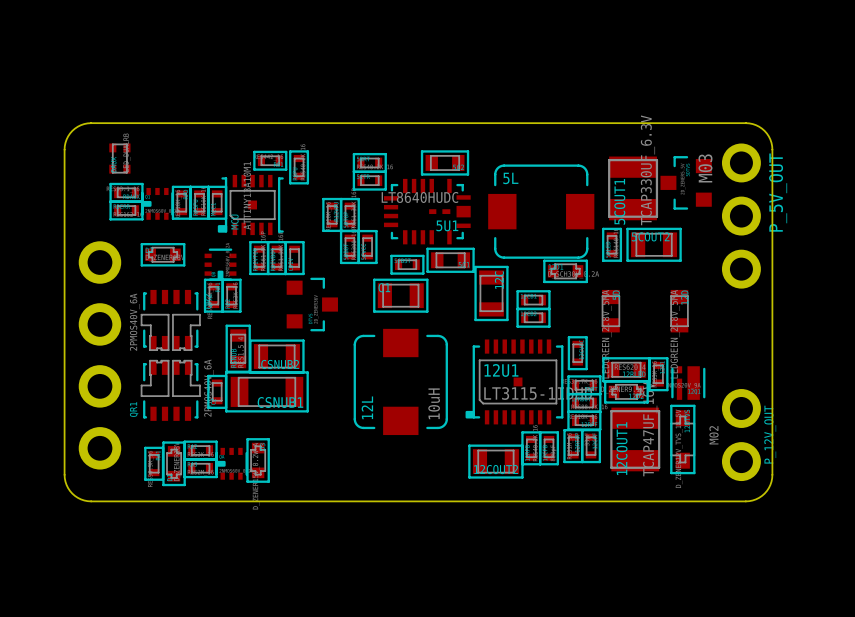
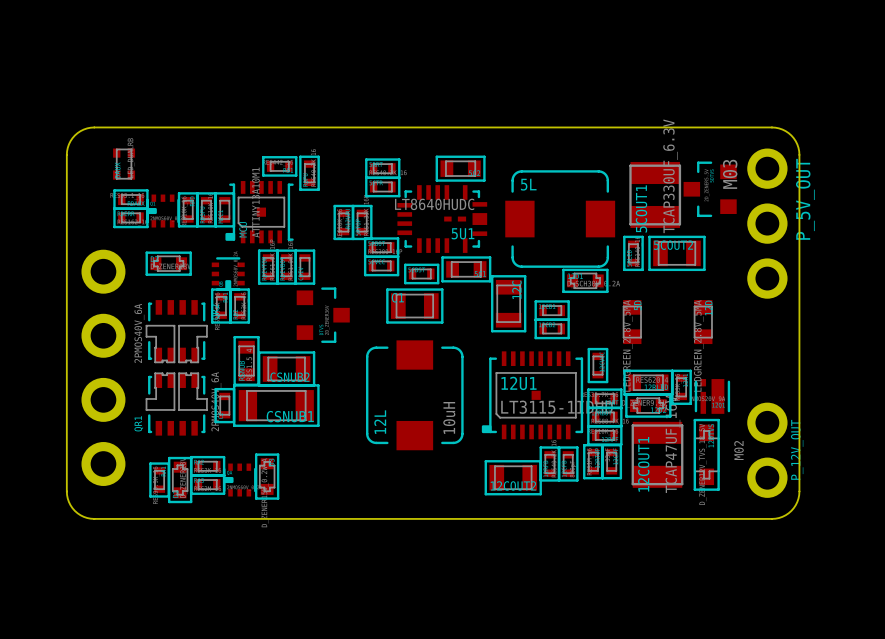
part rotation: 0° (349, 247) -> 90° clockwise (381, 247)
part rotation: 0° (367, 247) -> 90° clockwise (381, 265)

